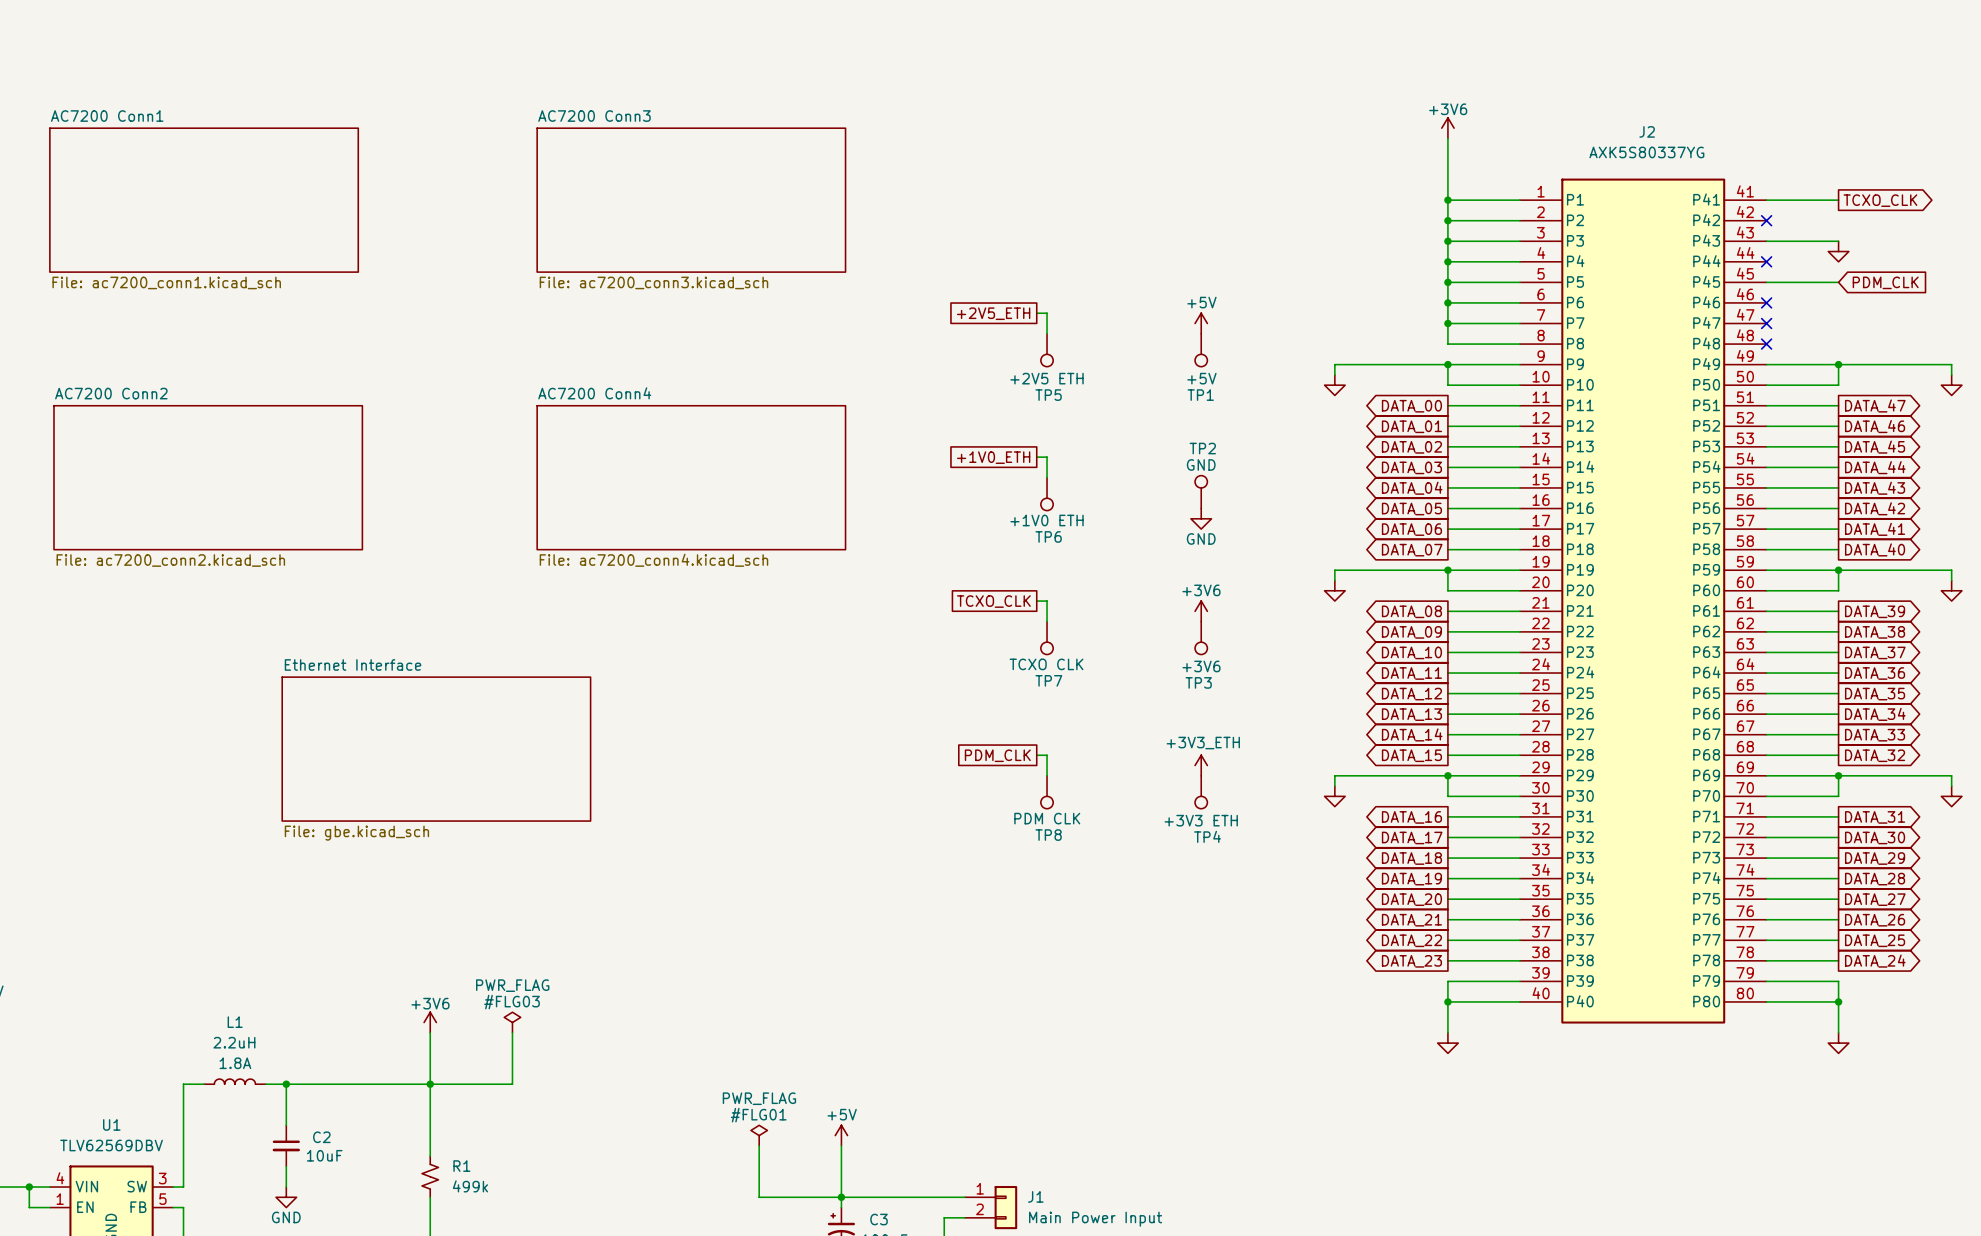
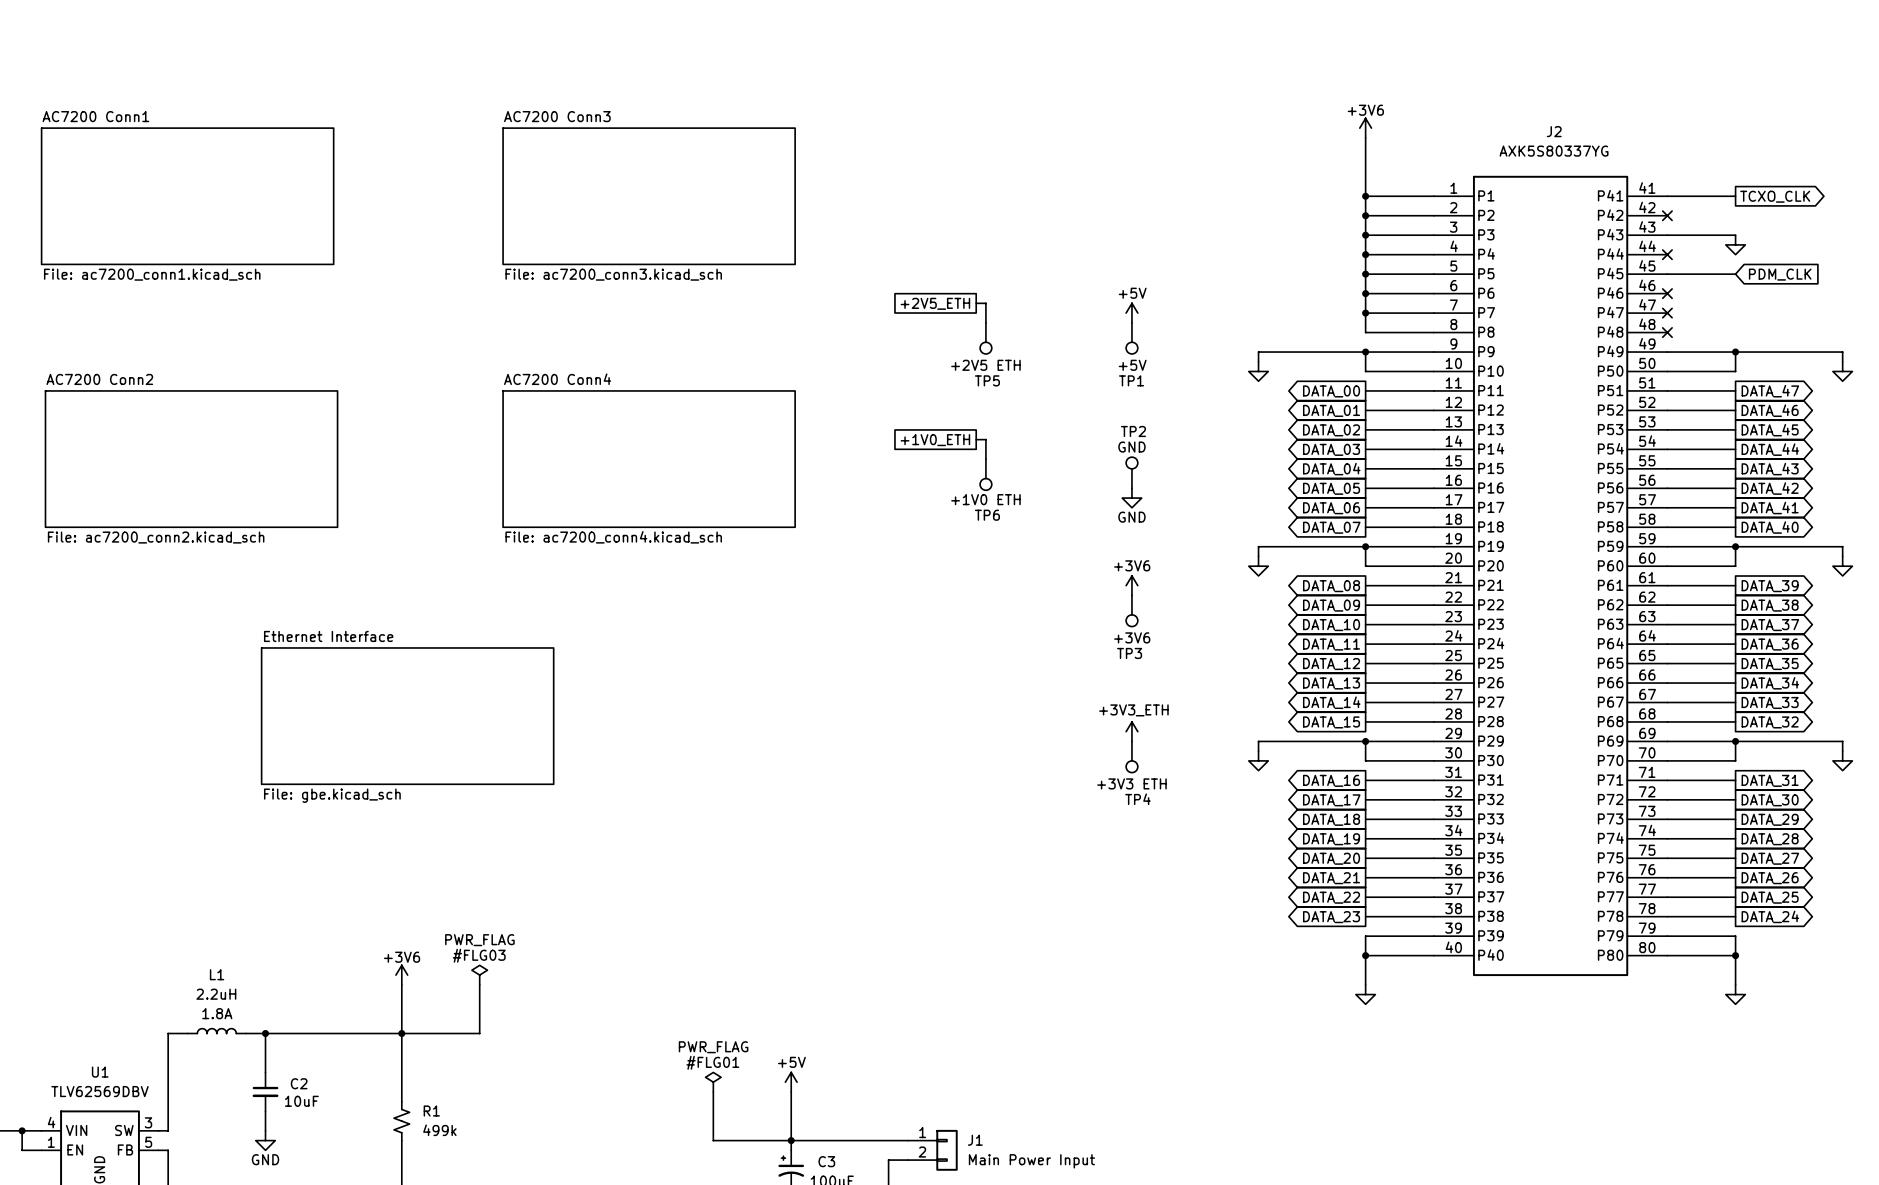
global label: TCXO_CLK (993, 601) -> none
wire: (1036, 601) (1047, 601) (1047, 621) -> none
TP7: TCXO CLK (1047, 638) -> none
global label: PDM_CLK (997, 755) -> none
wire: (1036, 755) (1047, 755) (1047, 775) -> none
TP8: PDM CLK (1047, 792) -> none

